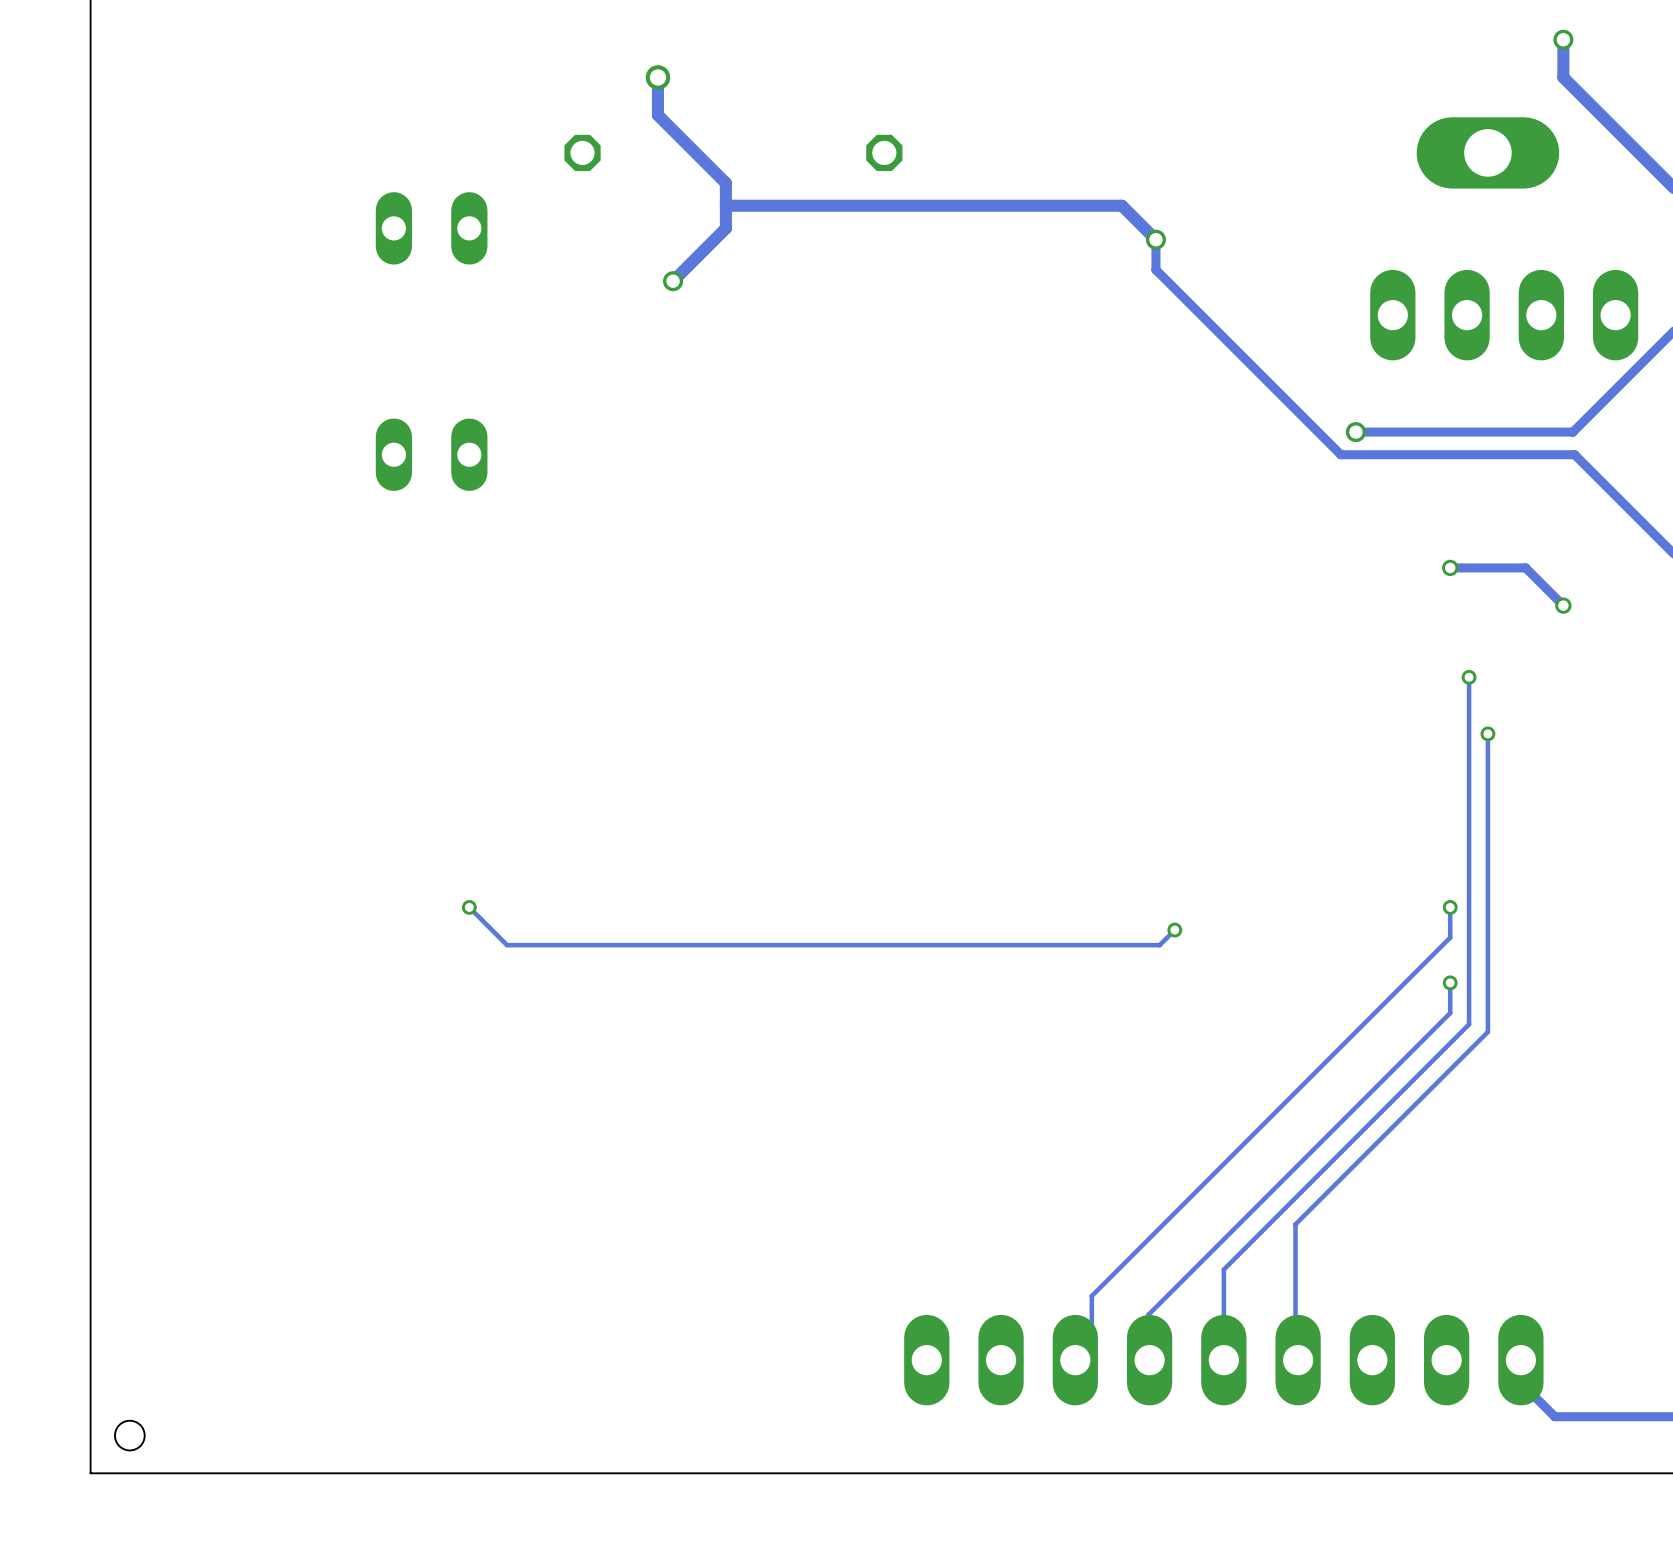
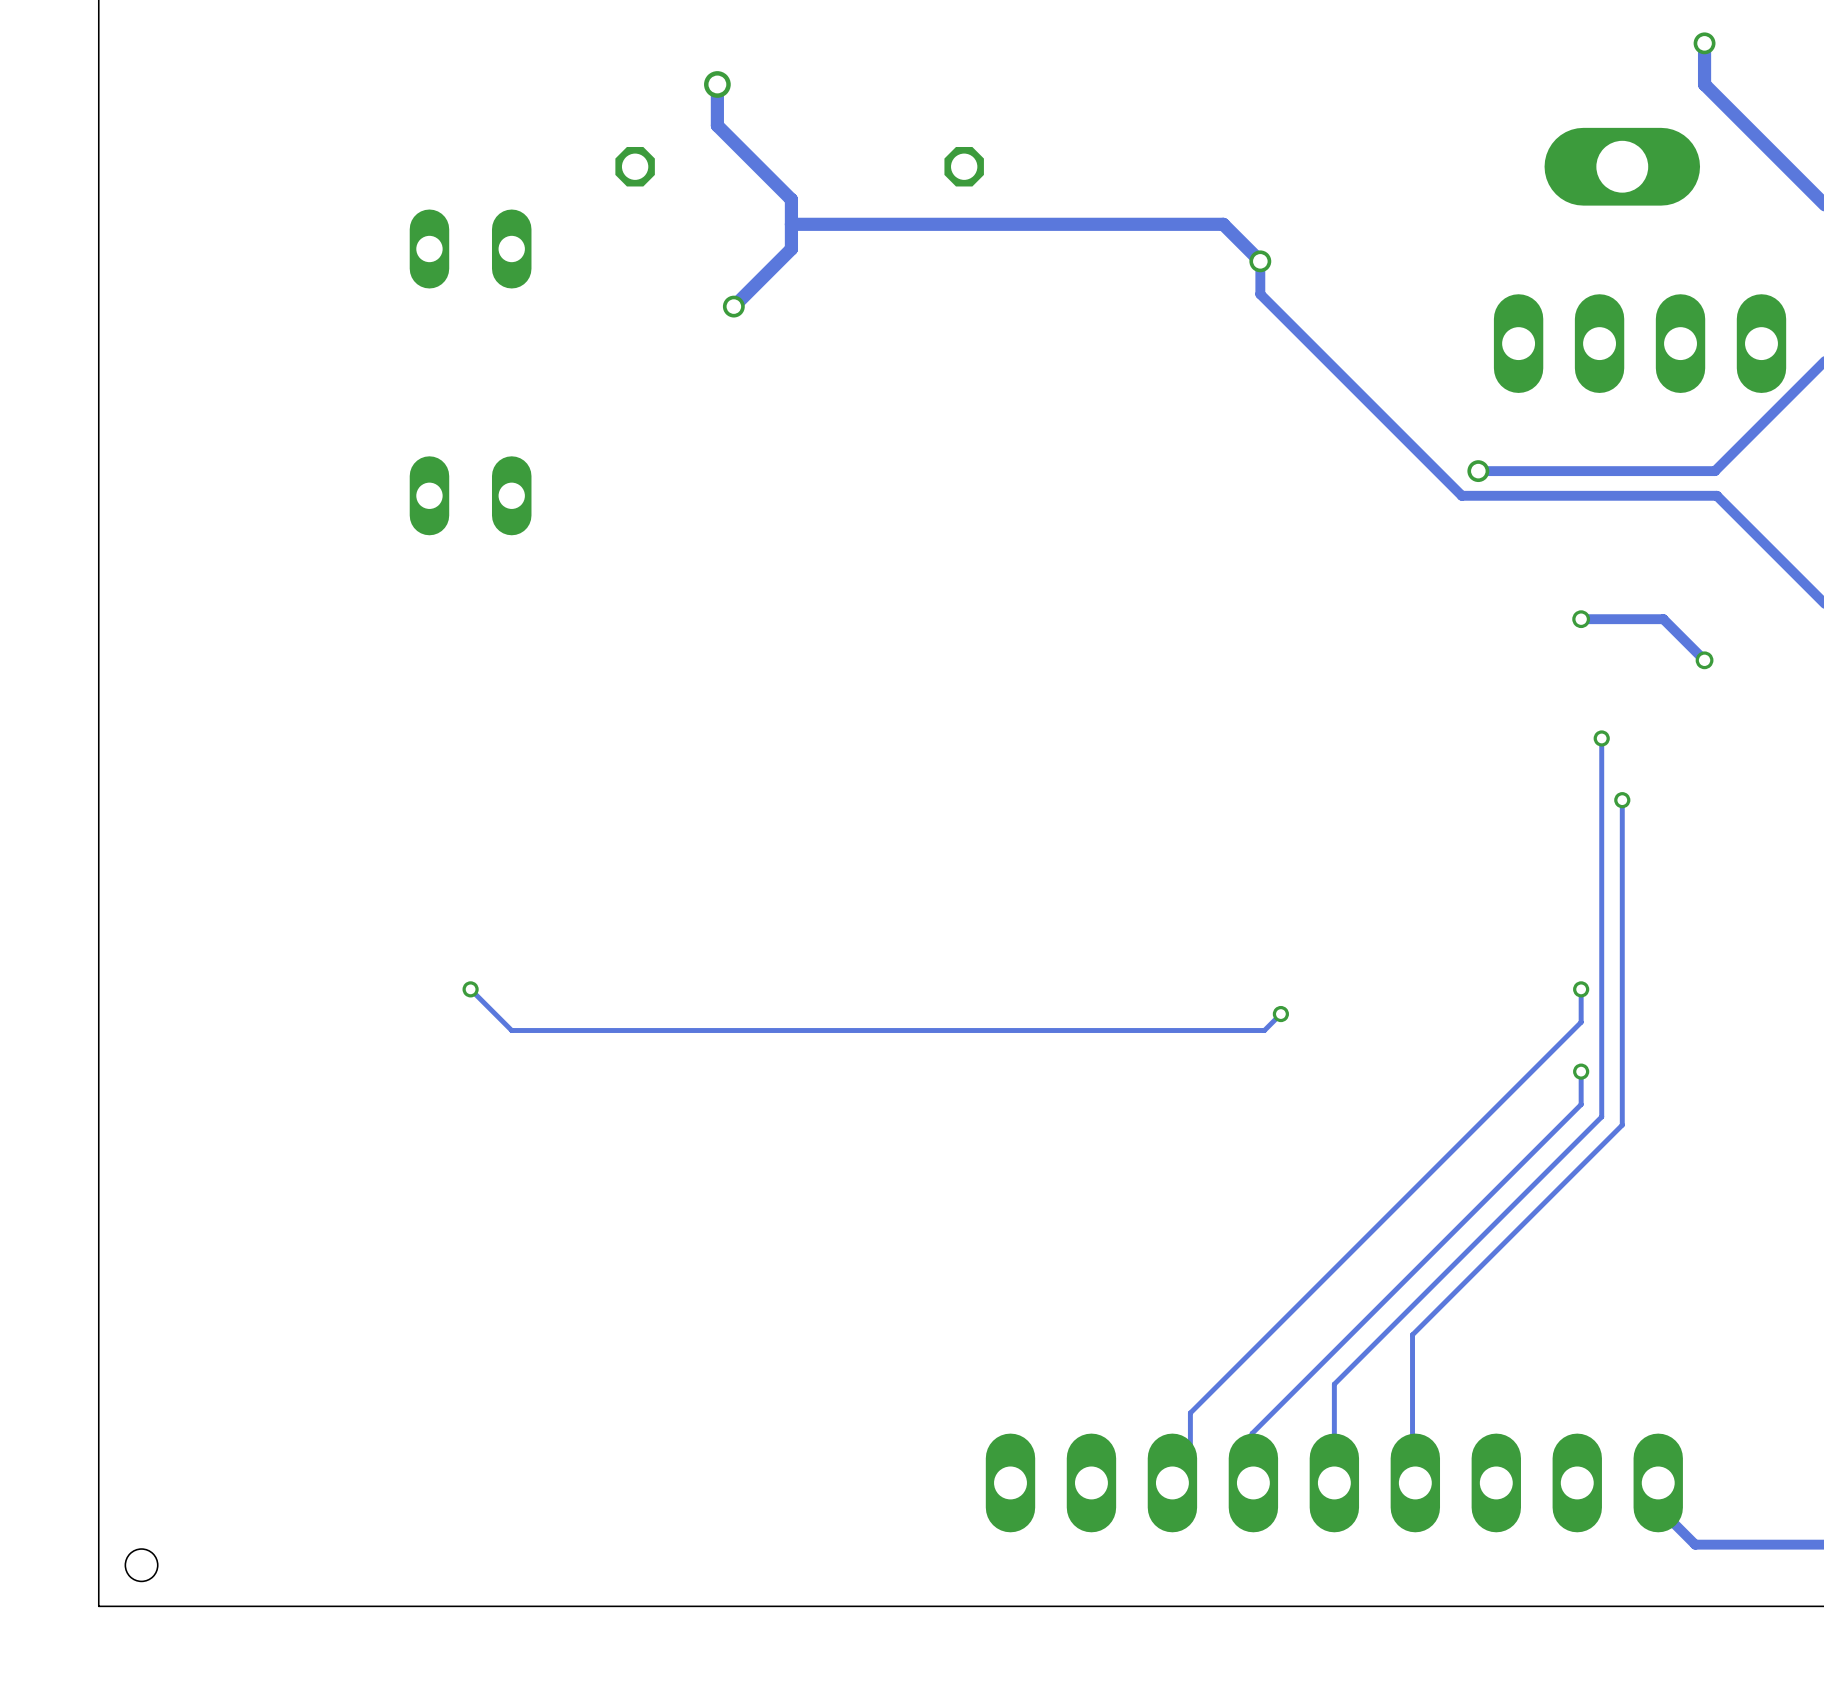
track: (469, 907) (507, 945) -> (470, 989) (511, 1030) (552, 1030)
via position: (469, 907) -> (470, 989)

